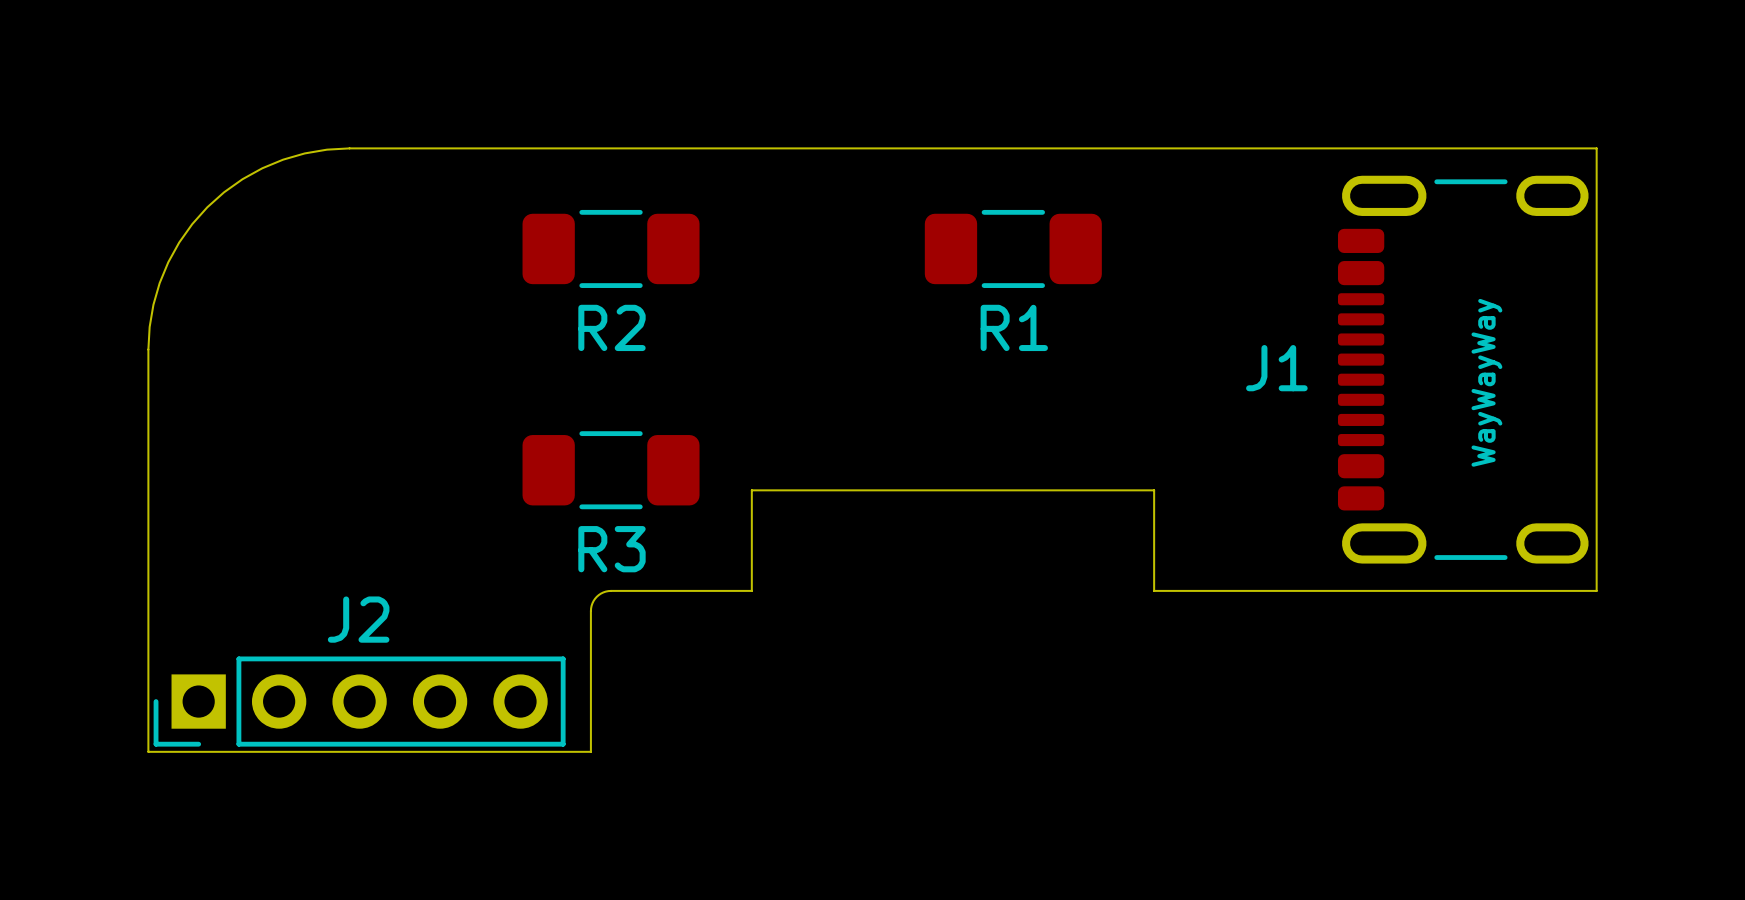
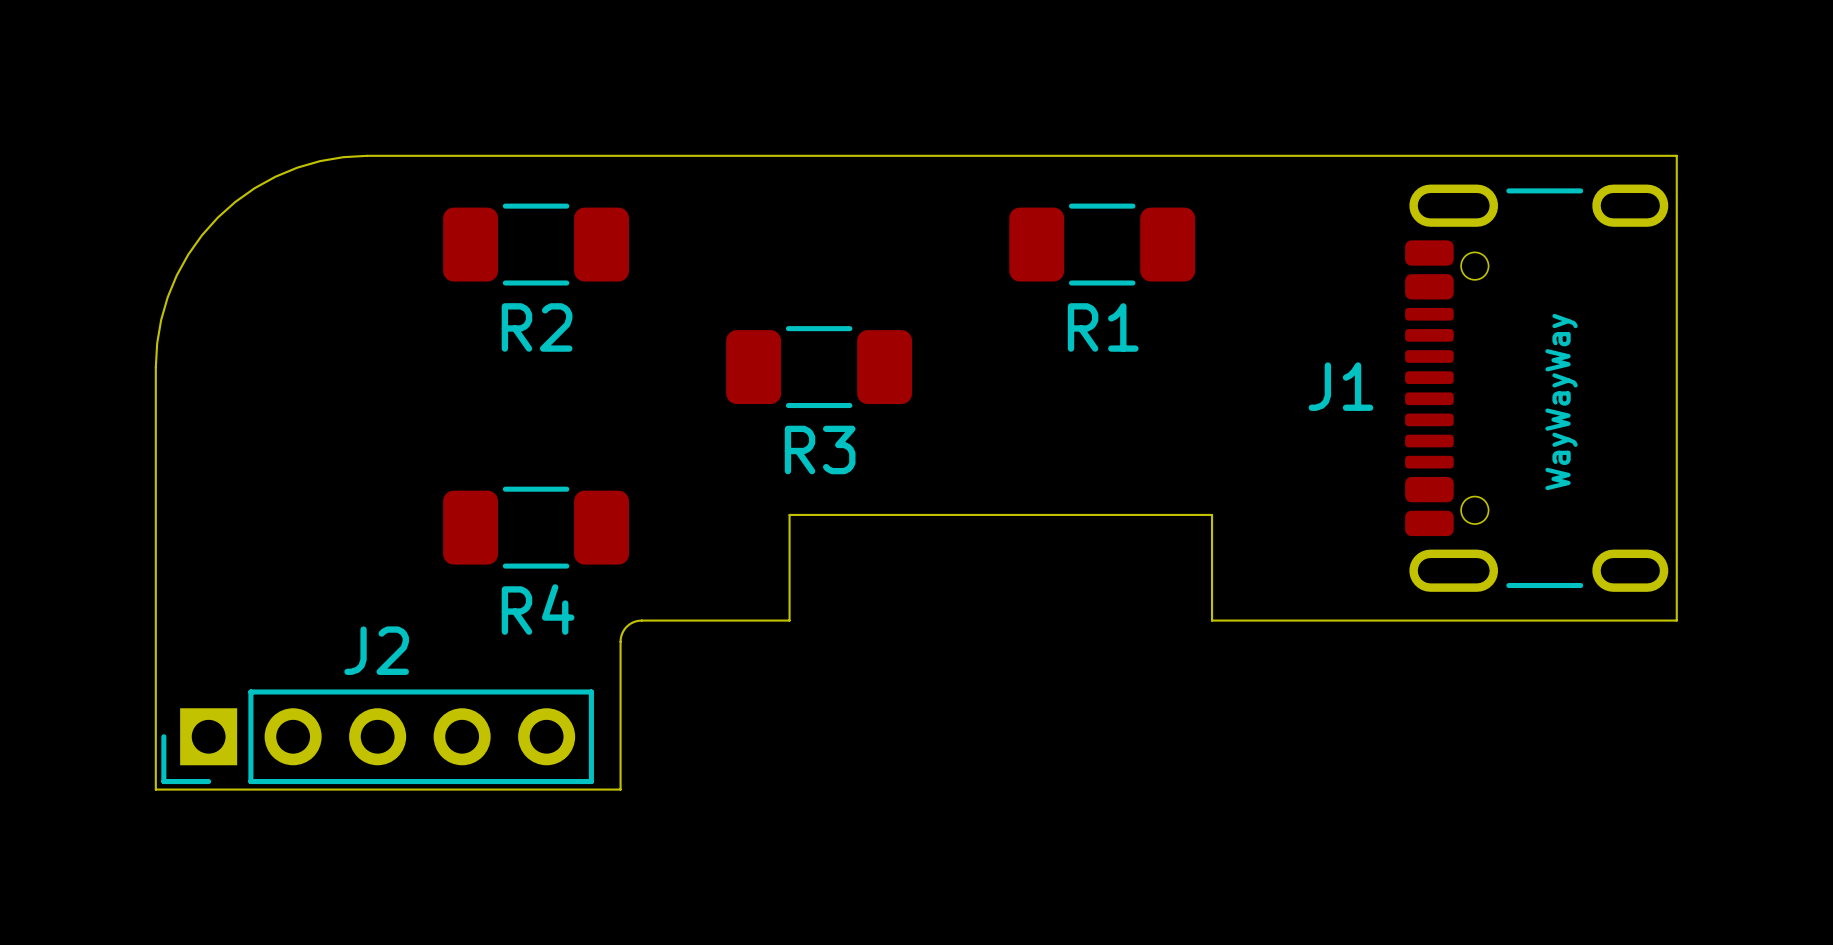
J1 footprint: [1337, 175, 1589, 564] -> [1405, 184, 1669, 592]
R2 position: (611, 248) -> (536, 244)
R1 position: (1013, 248) -> (1102, 244)
R3 position: (611, 470) -> (819, 367)
R4: none -> (536, 527)

